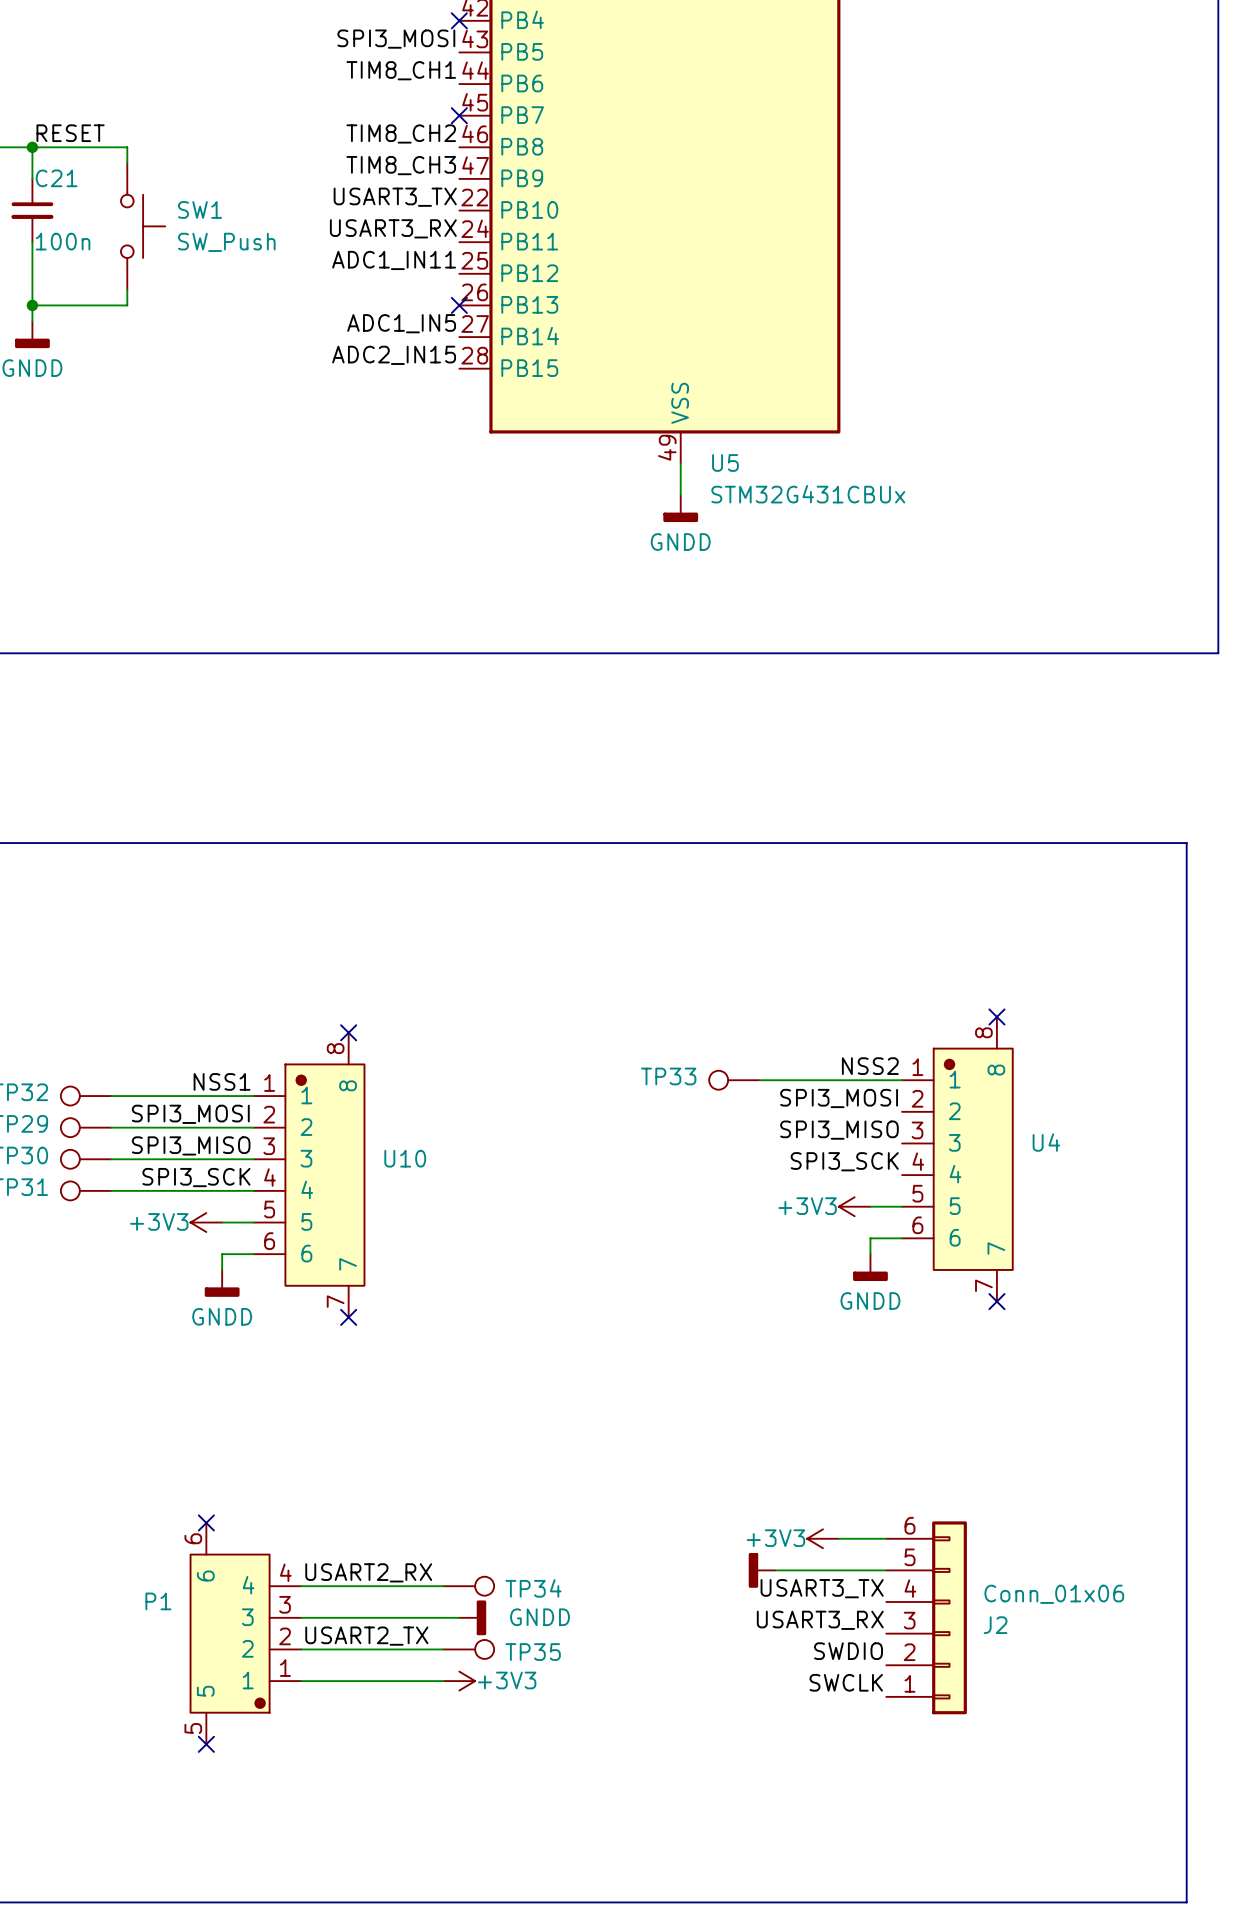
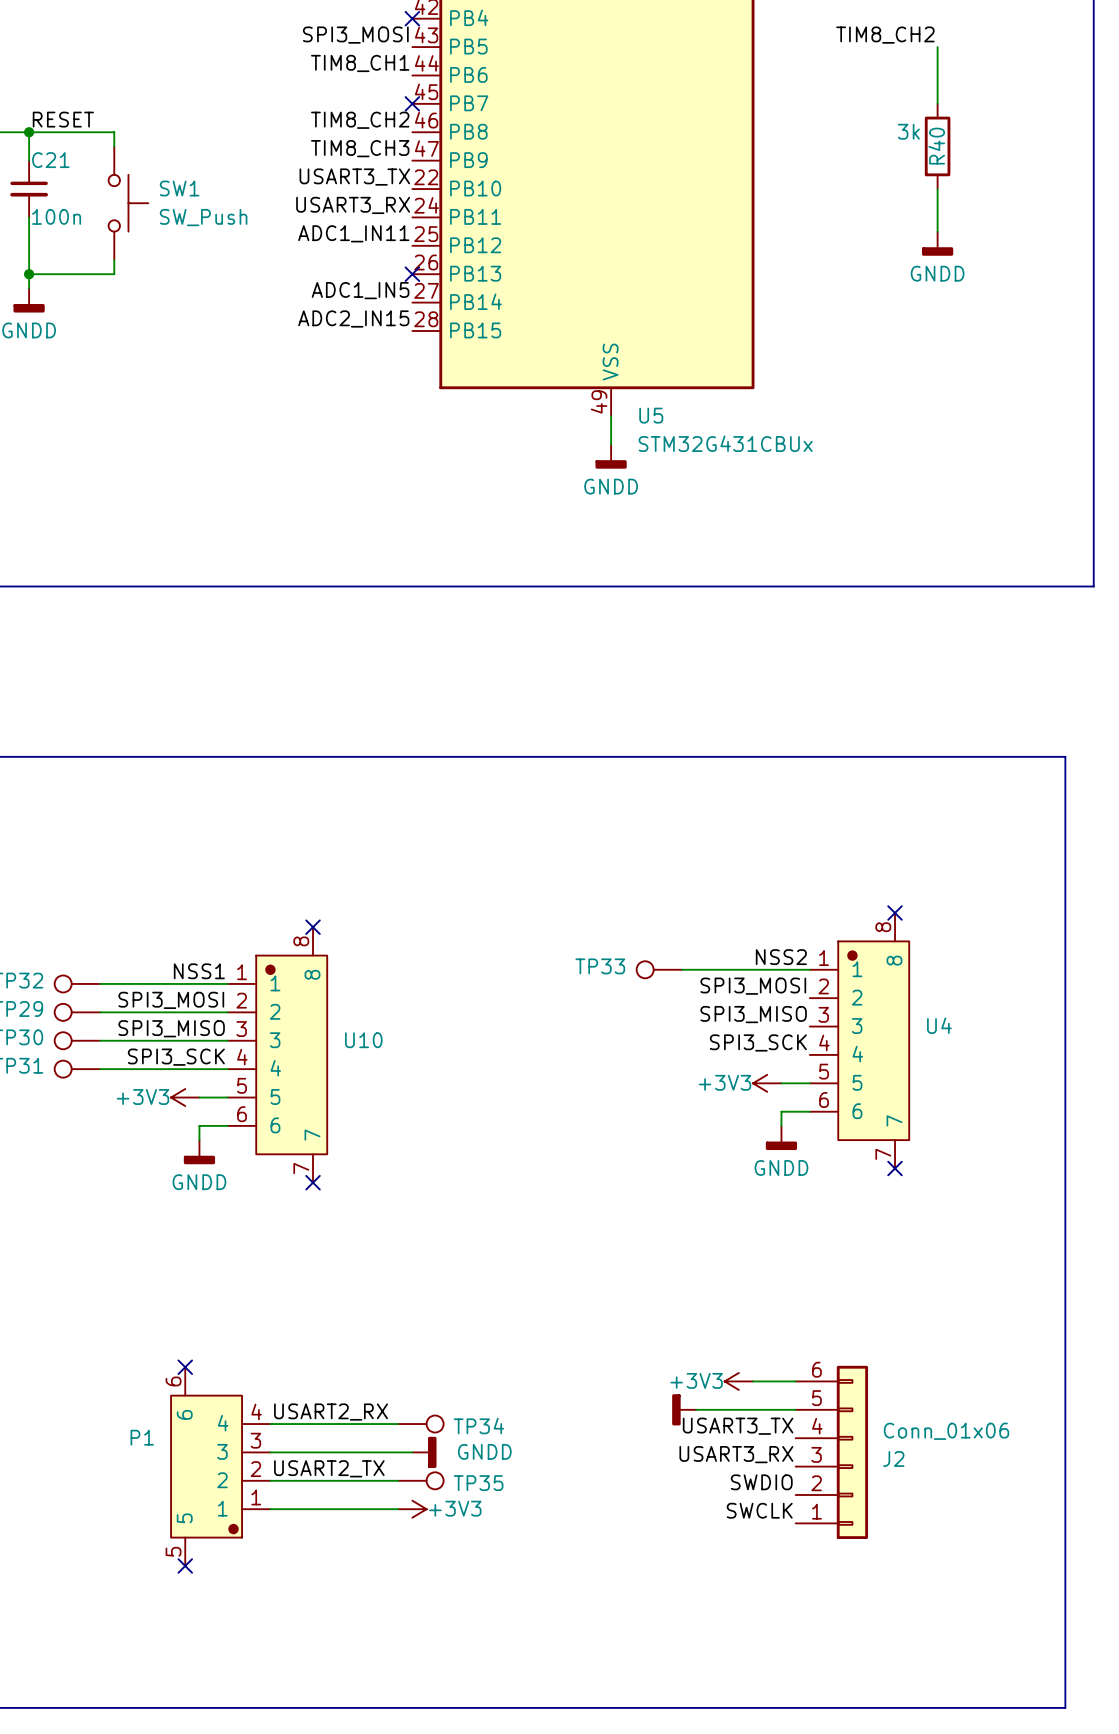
label: none -> TIM8_CH2 (885, 35)
wire: none -> (937, 47) (937, 103)
R40: none -> 3k (937, 146)
wire: none -> (937, 189) (937, 231)
power symbol: none -> GNDD (937, 243)

